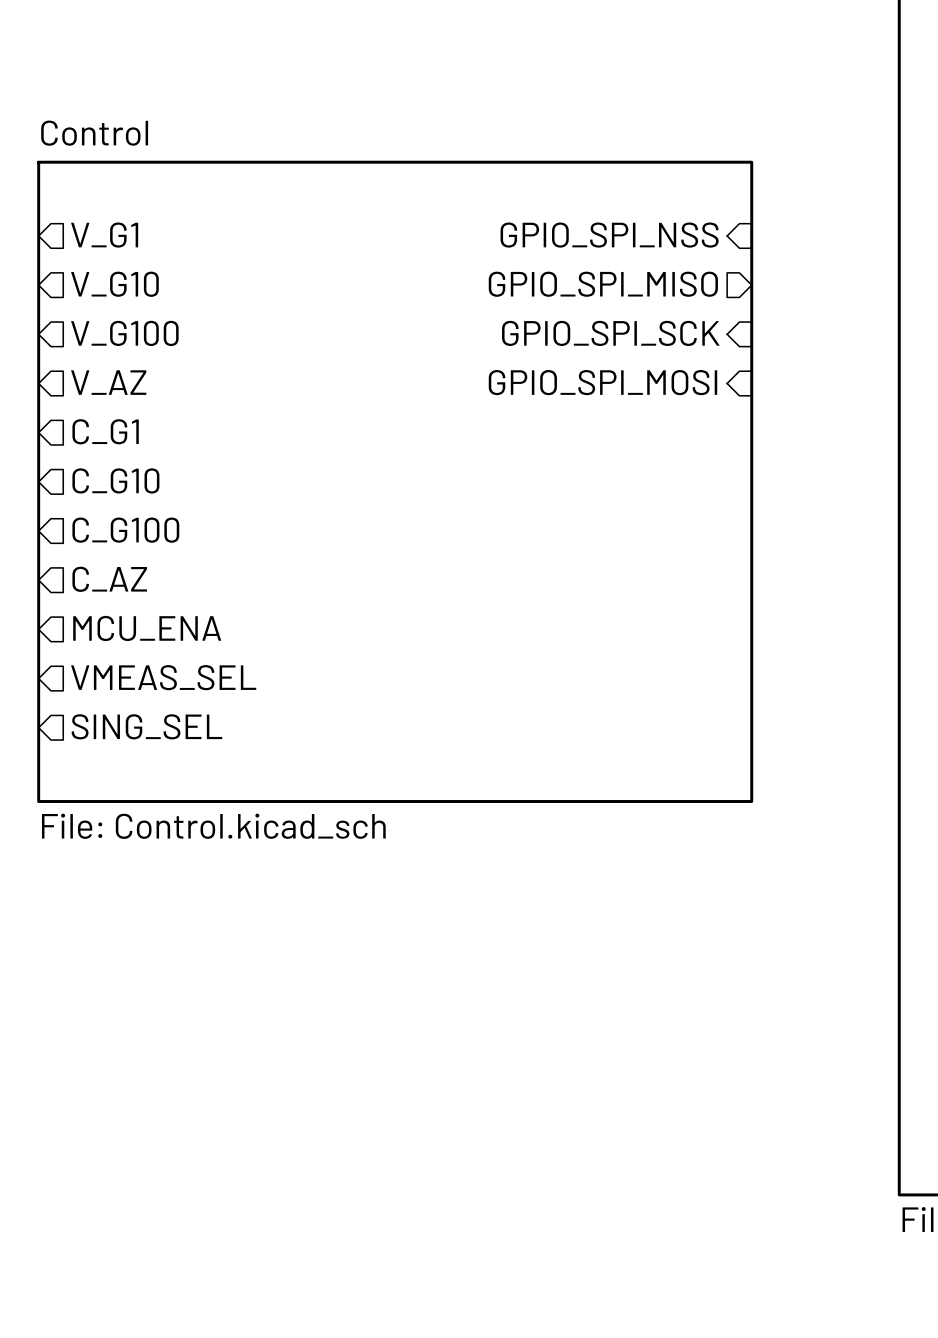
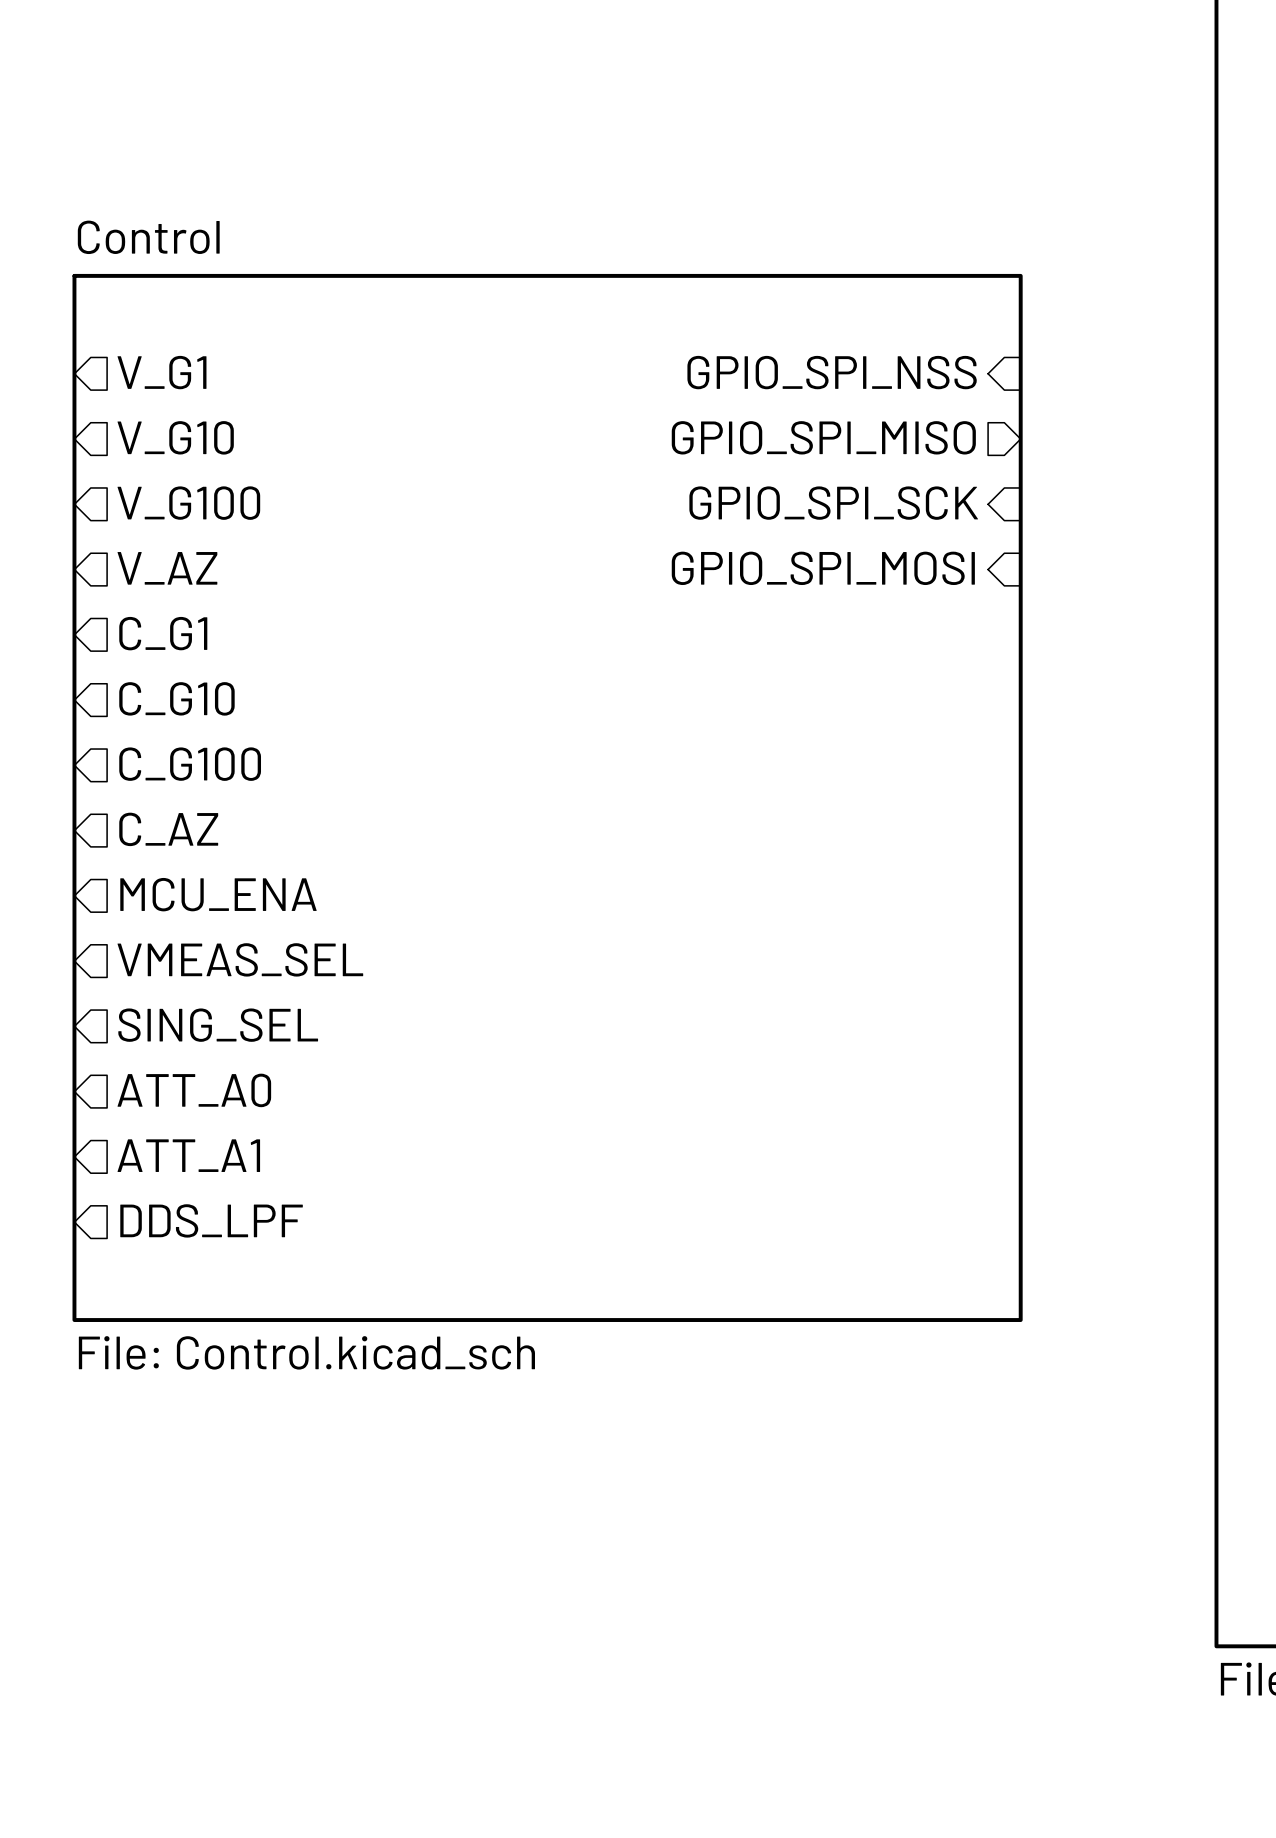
sheet Control: File: Control.kicad_sch (395, 481) -> none
sheet Control: none -> File: Control.kicad_sch (547, 797)
sheet pin: none -> ATT_A0 (194, 1090)
sheet pin: none -> ATT_A1 (188, 1155)
sheet pin: none -> DDS_LPF (211, 1220)

